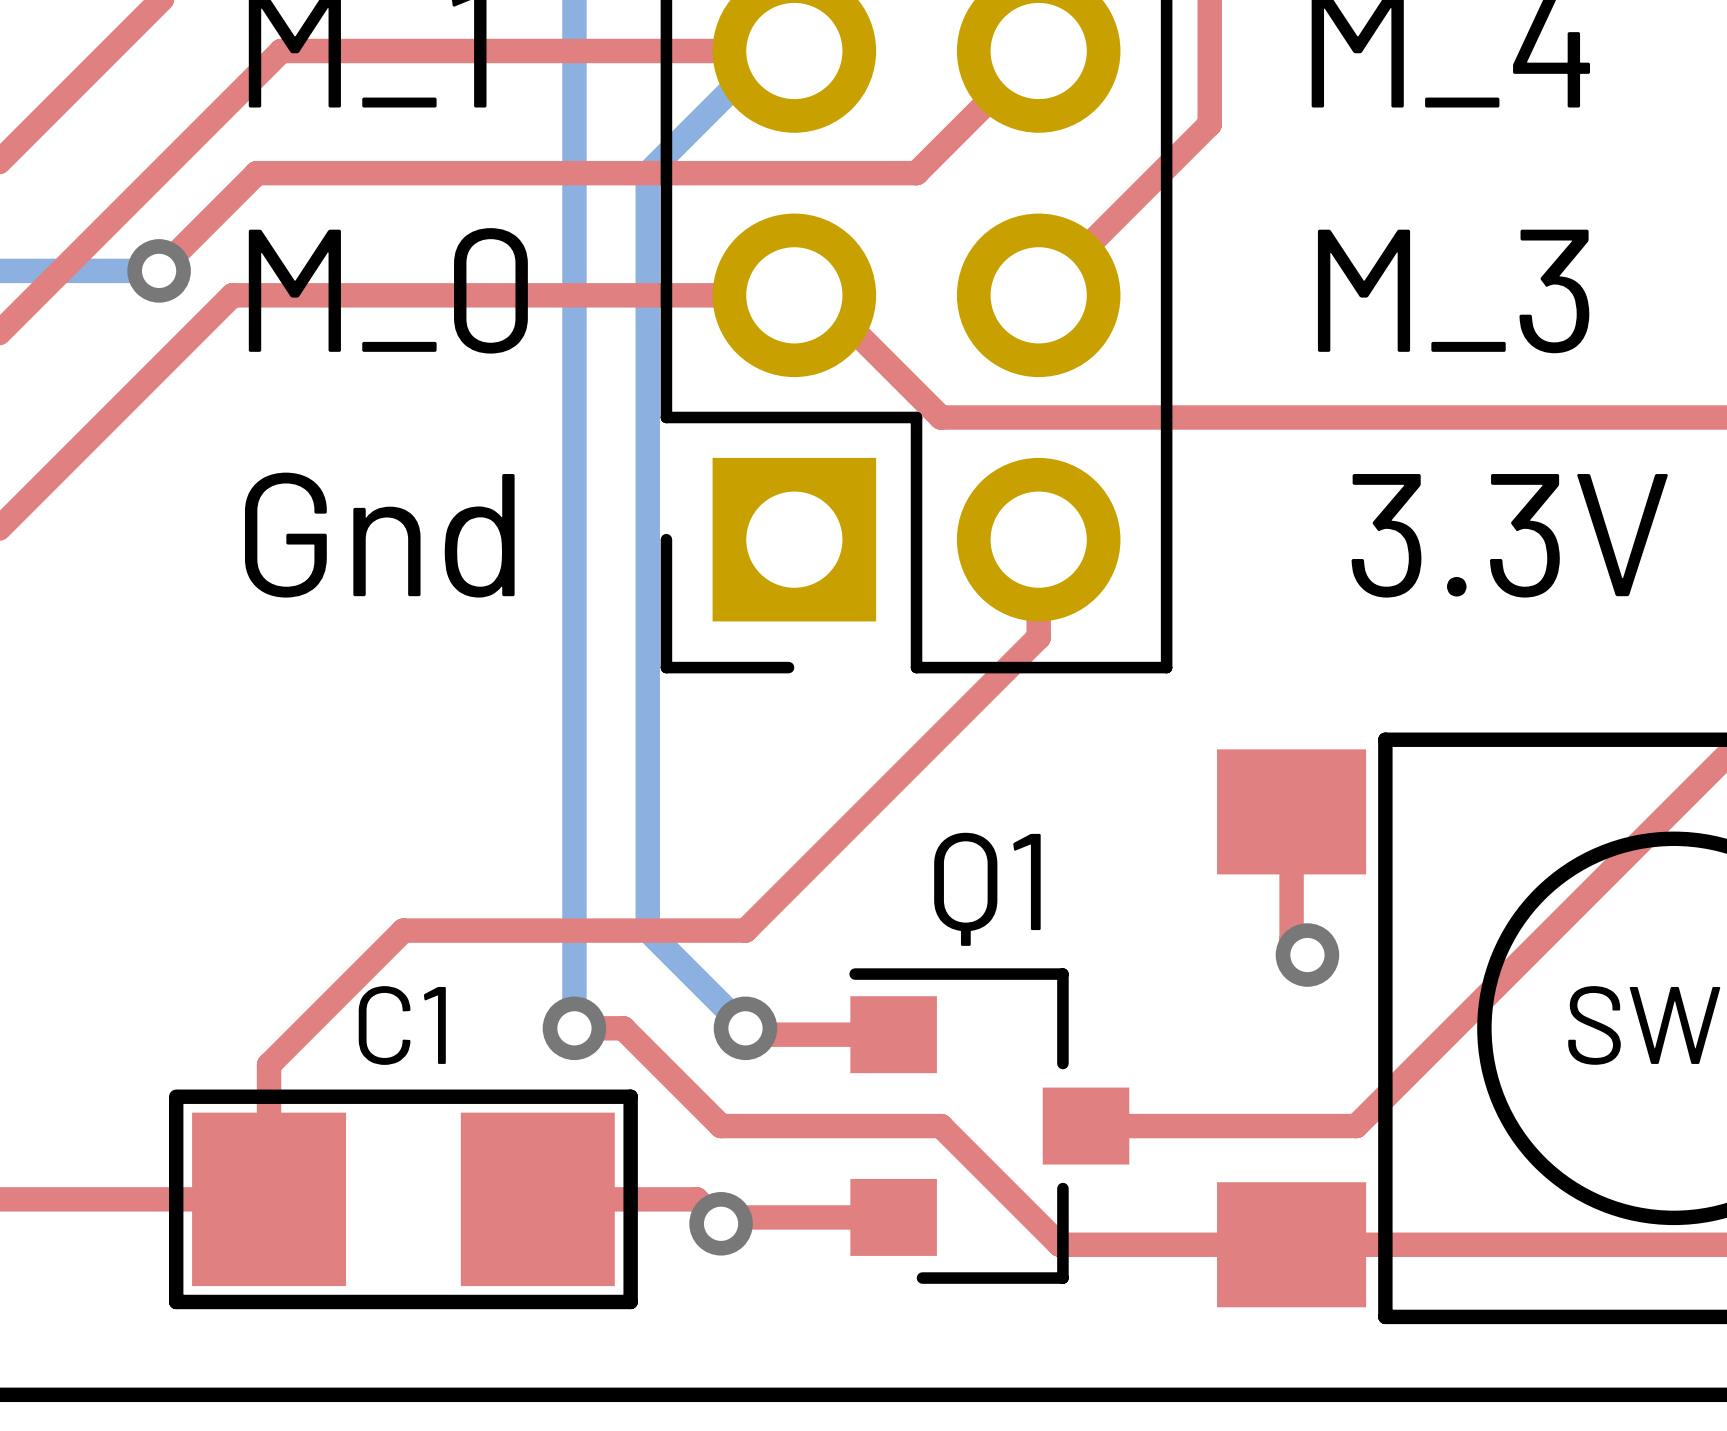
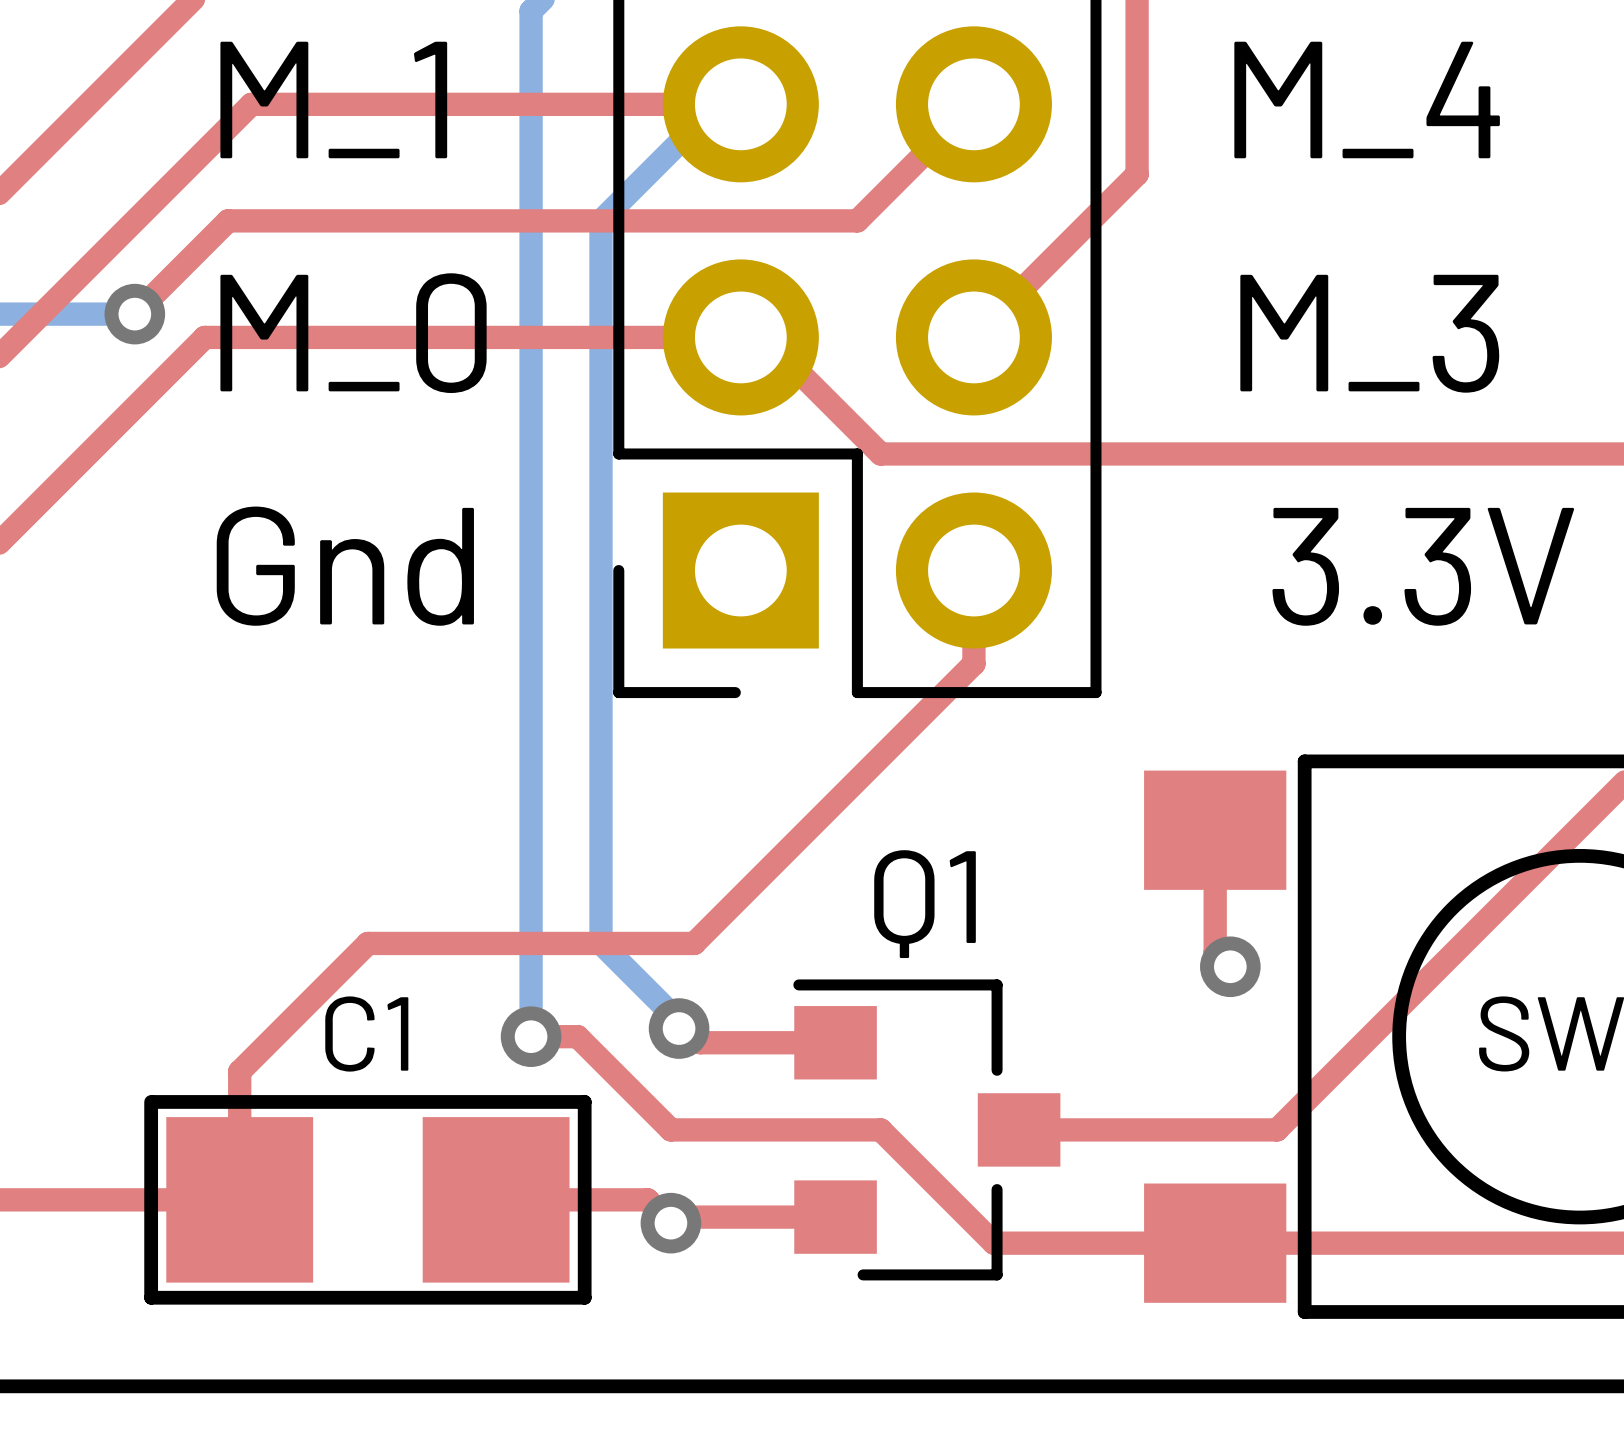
via position: (745, 1028) -> (679, 1028)

